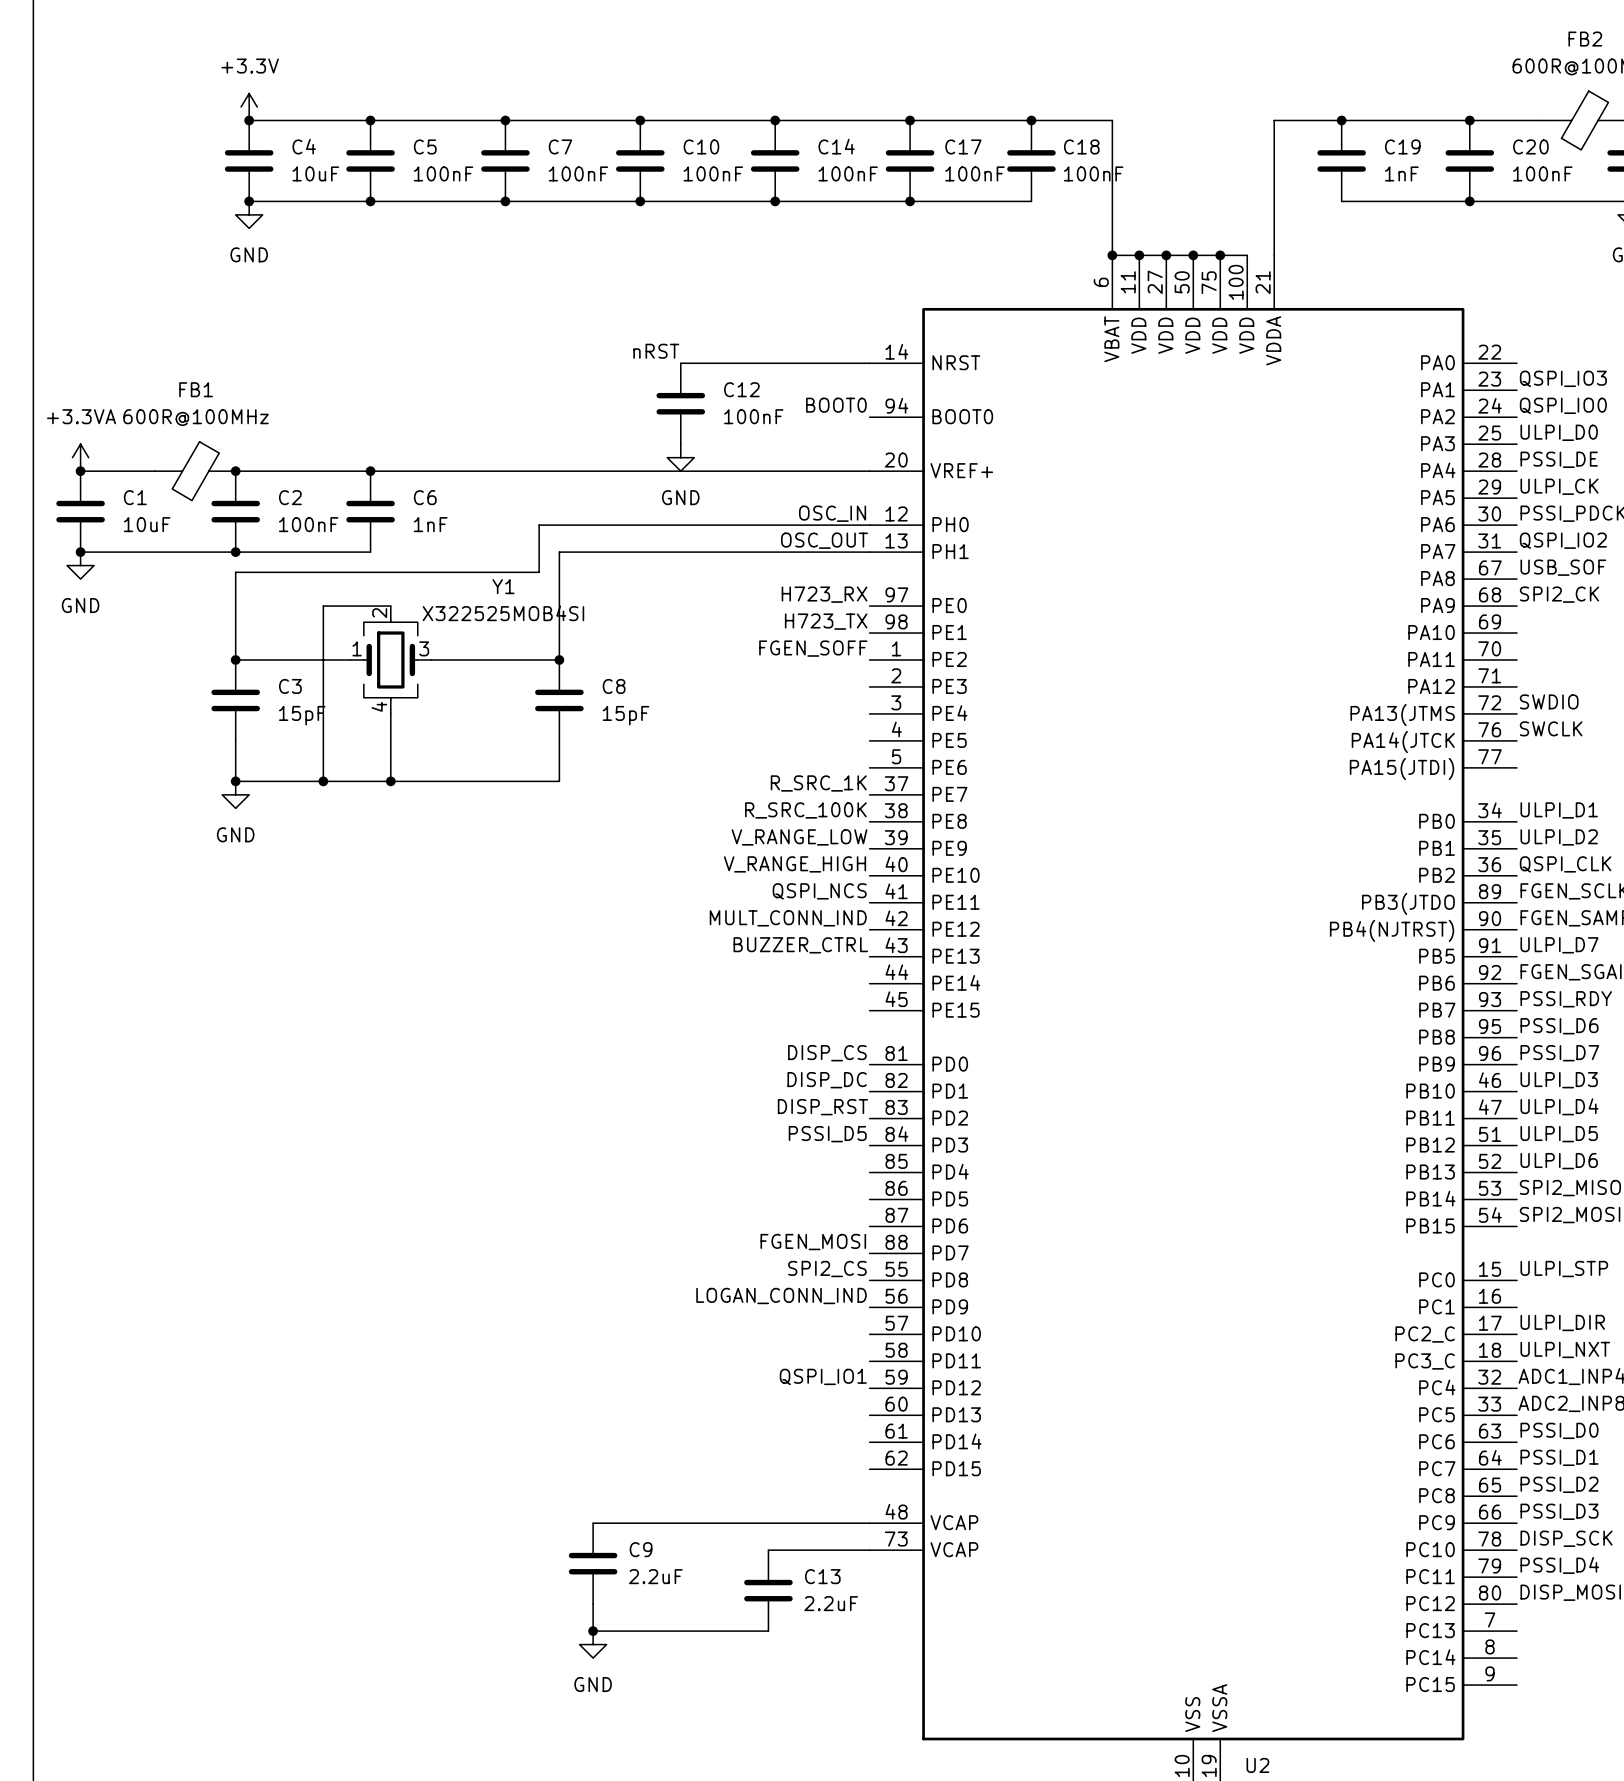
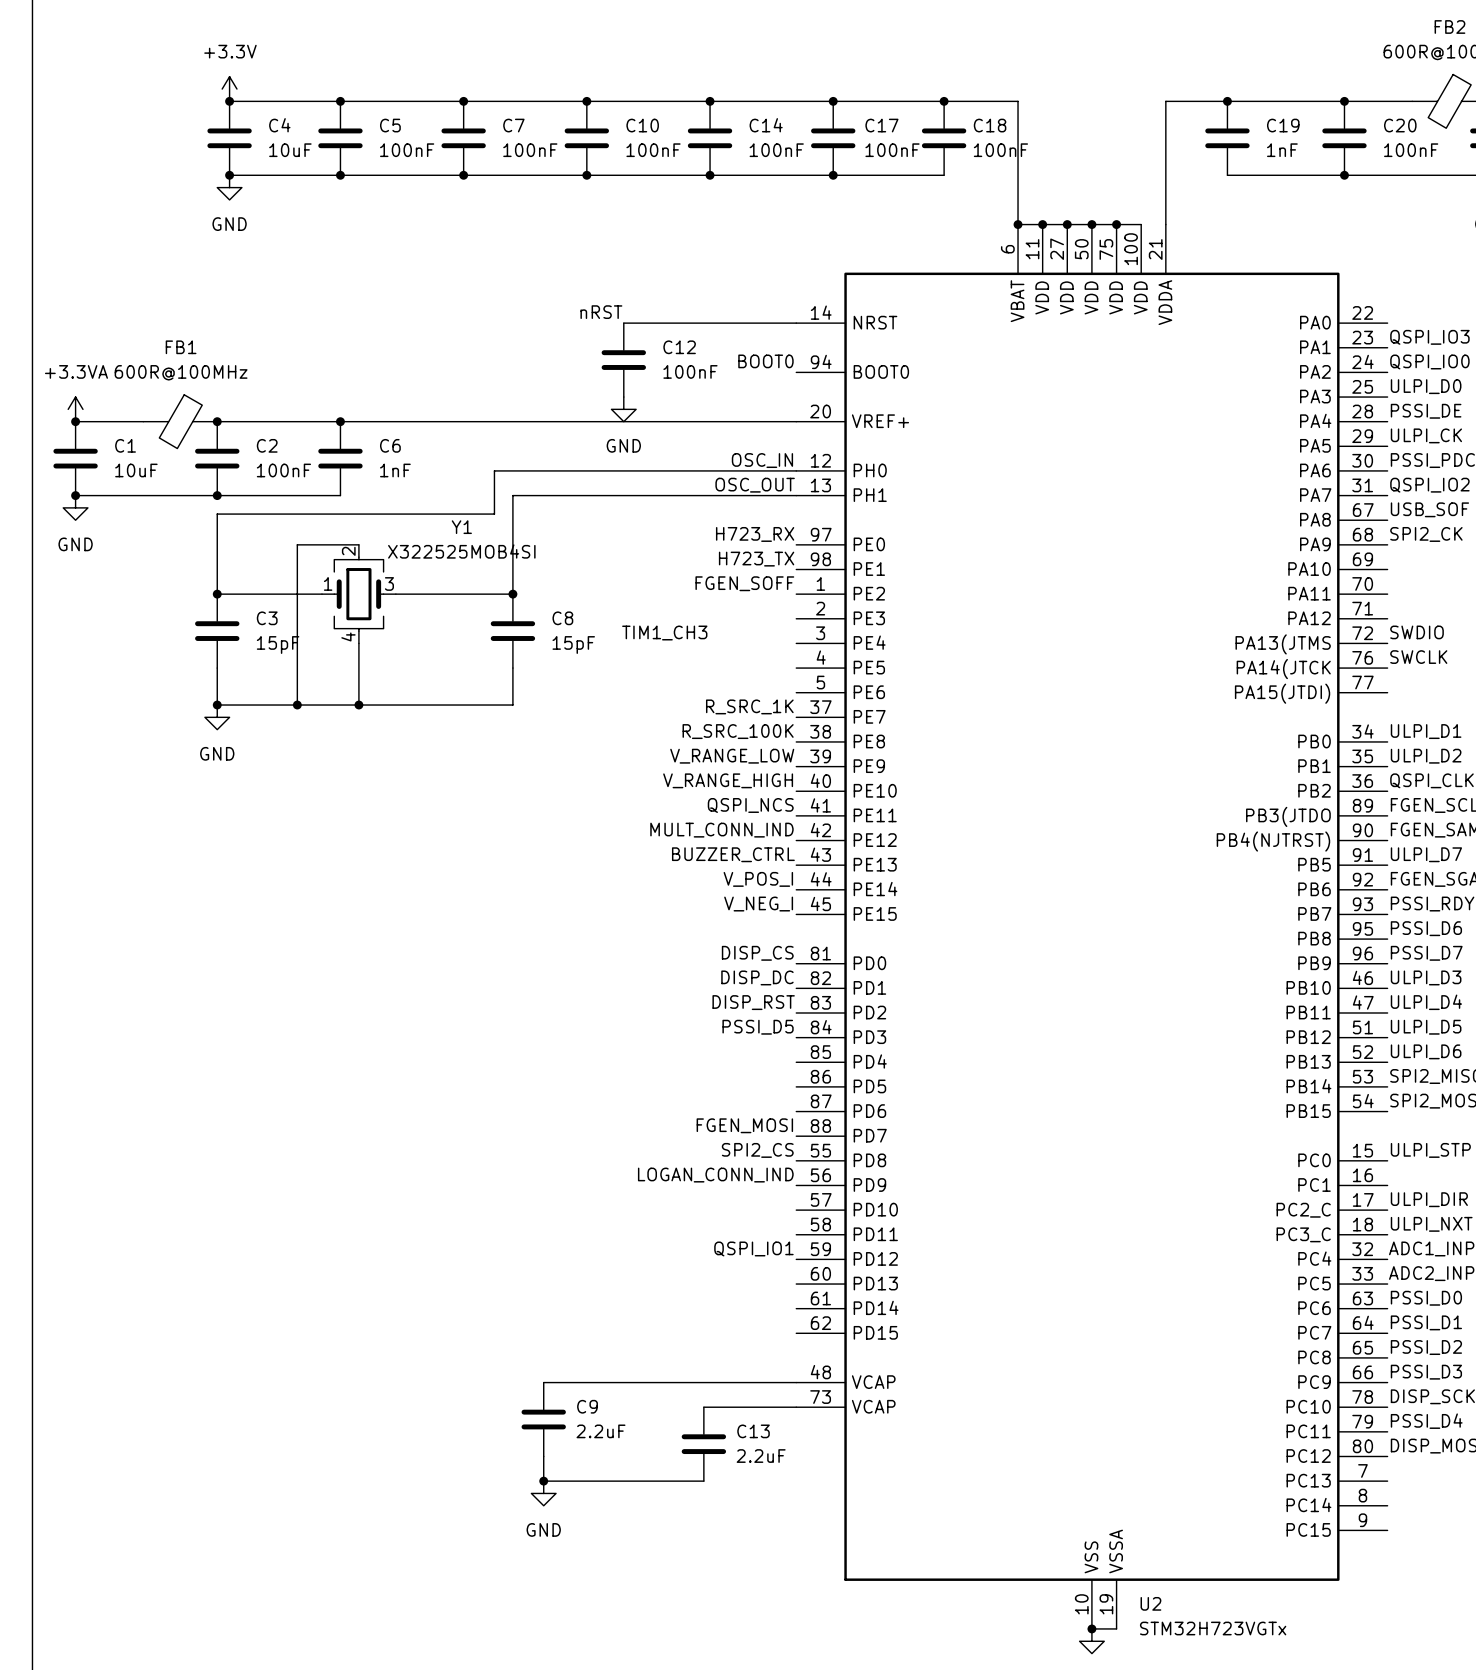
label: none -> TIM1_CH3 (664, 633)
label: none -> V_POS_I (758, 879)
label: none -> V_NEG_I (758, 904)

